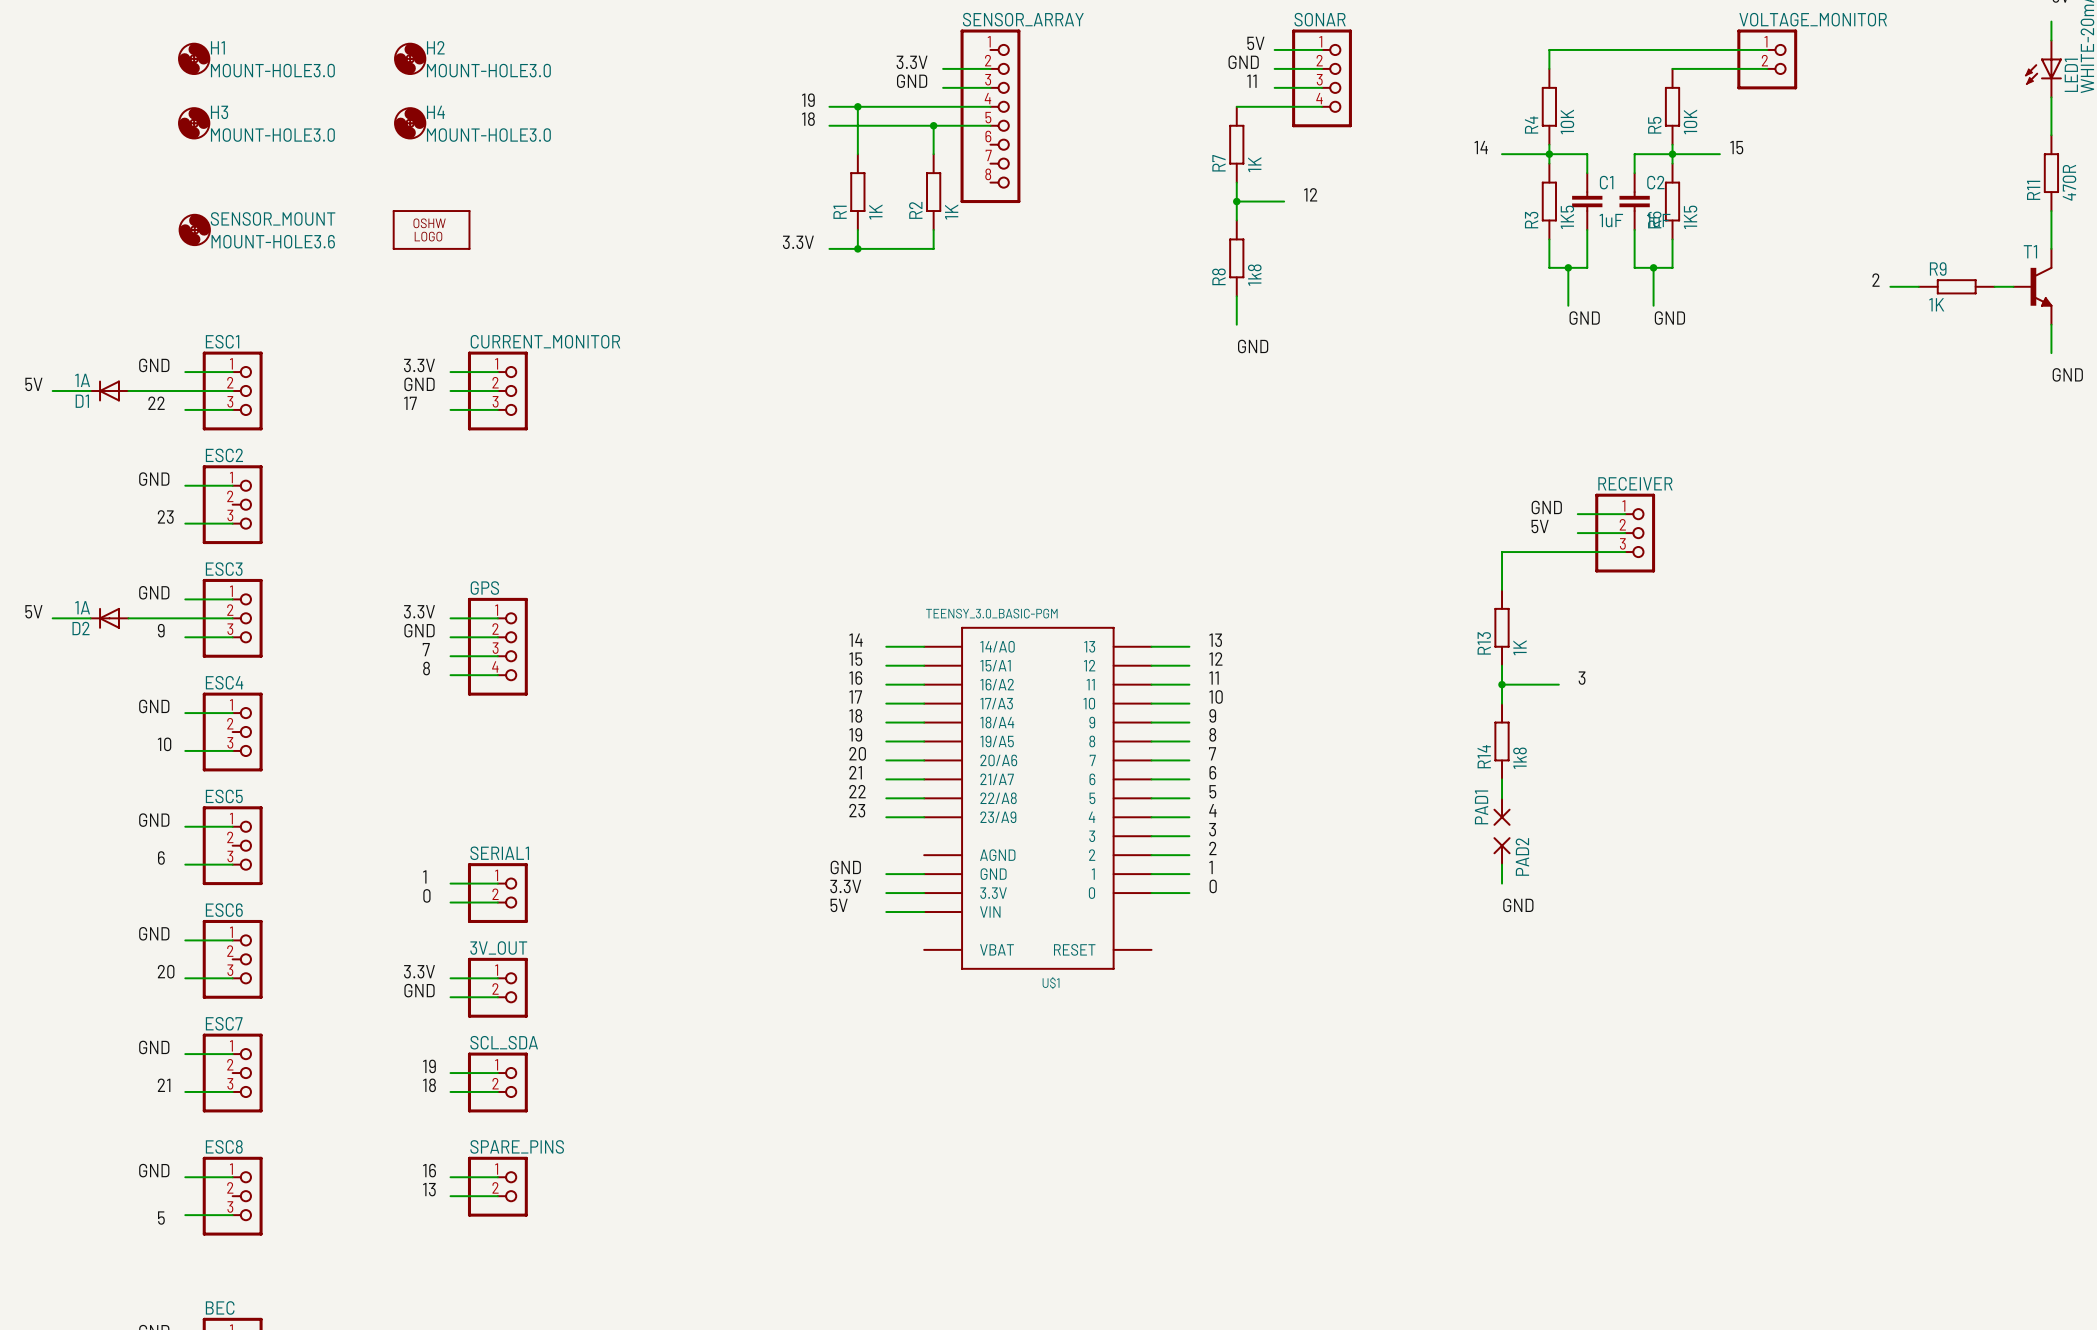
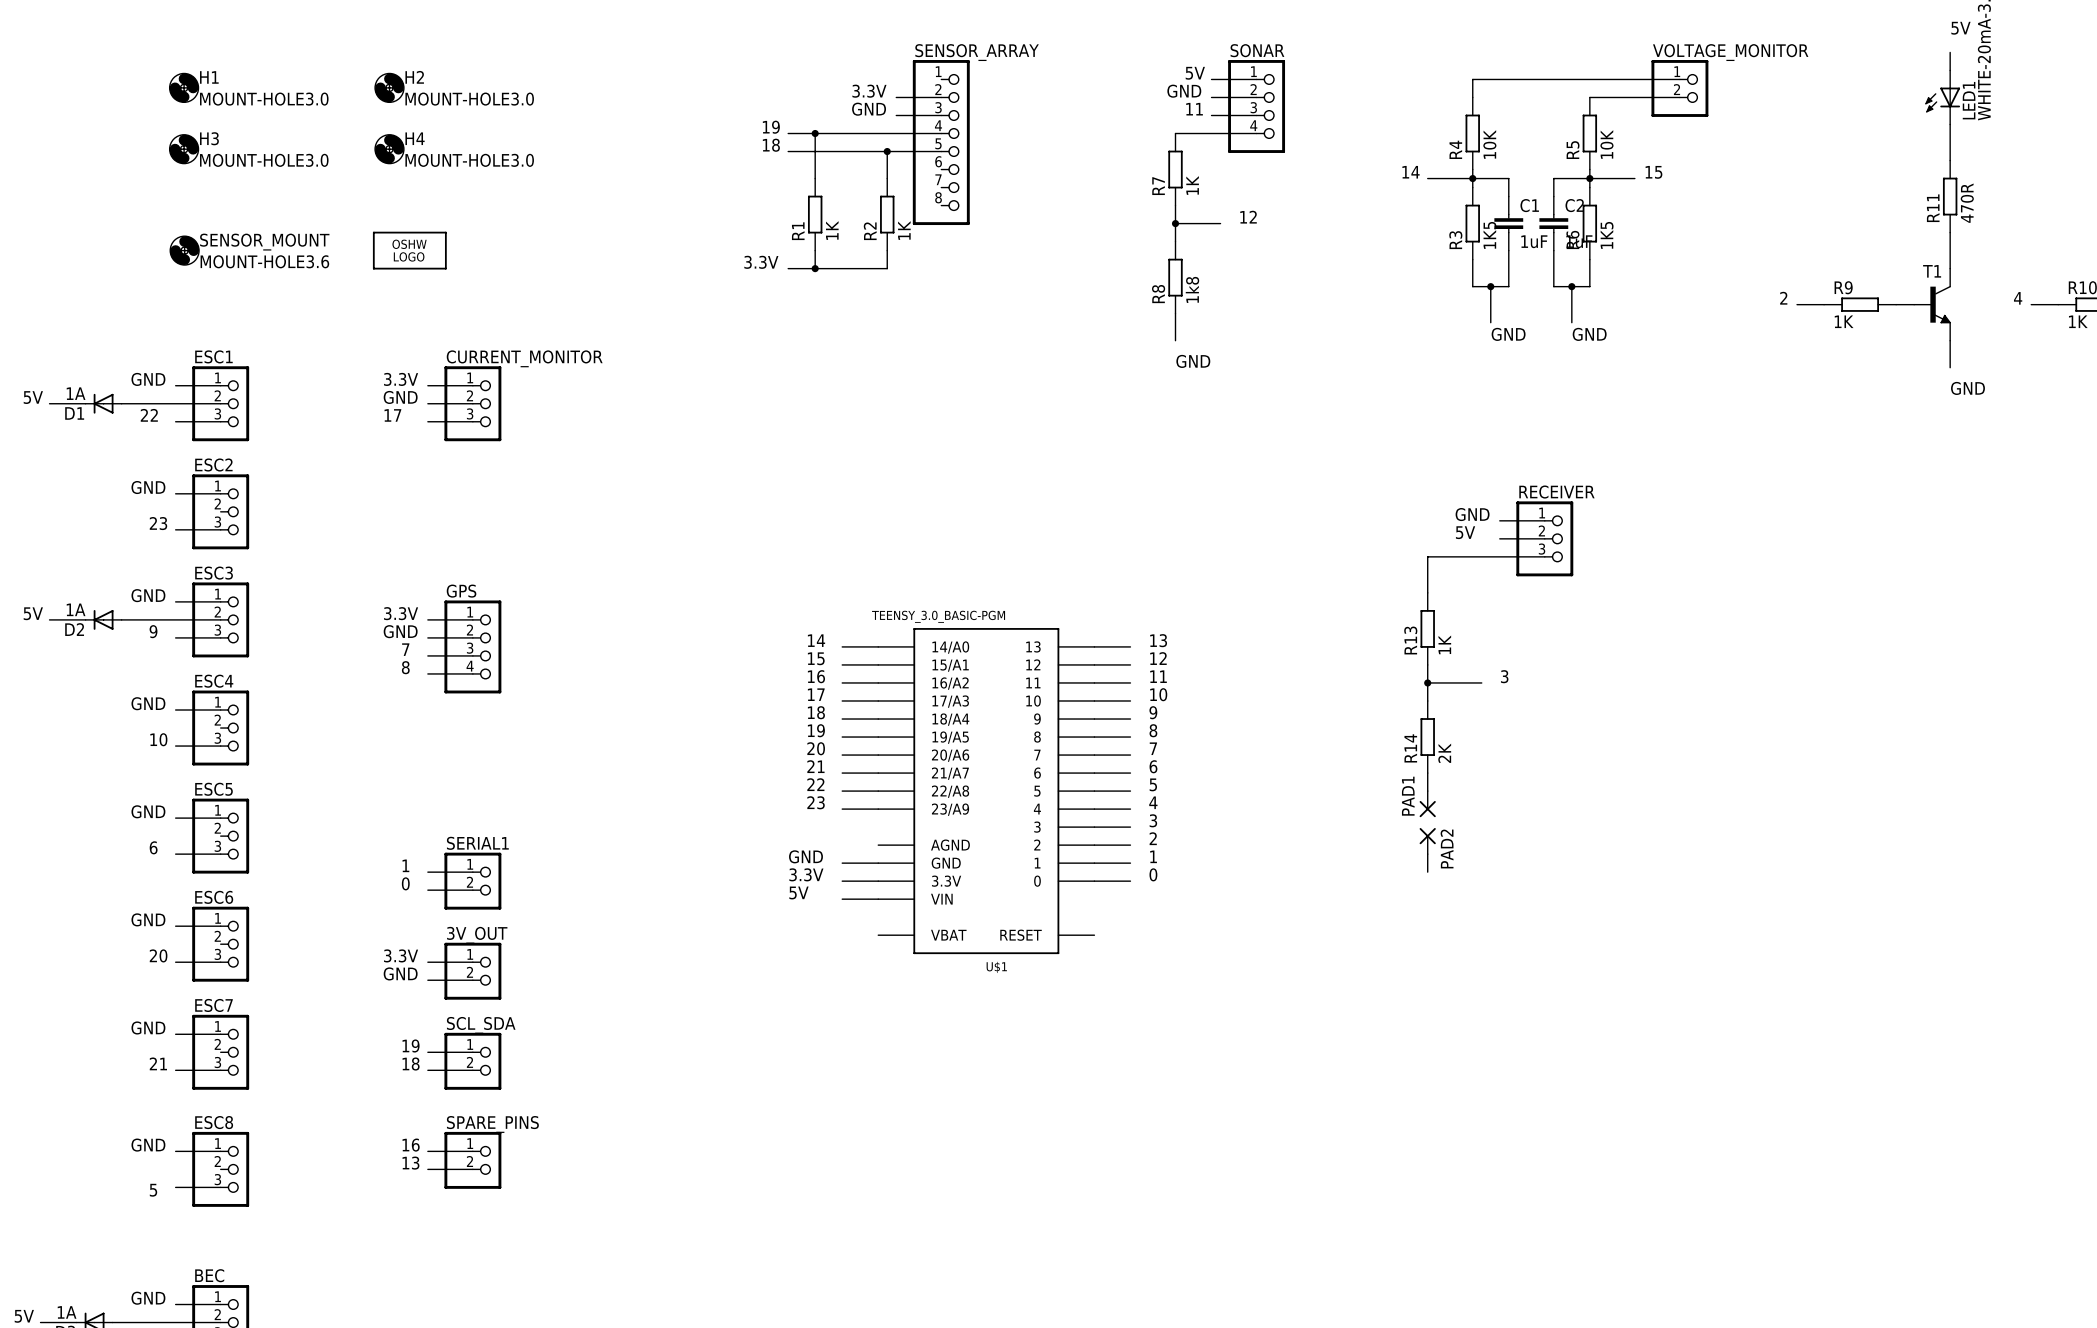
R14 value: 1k8 (1519, 758) -> 2K (1444, 753)
label: GND (1518, 905) -> none

